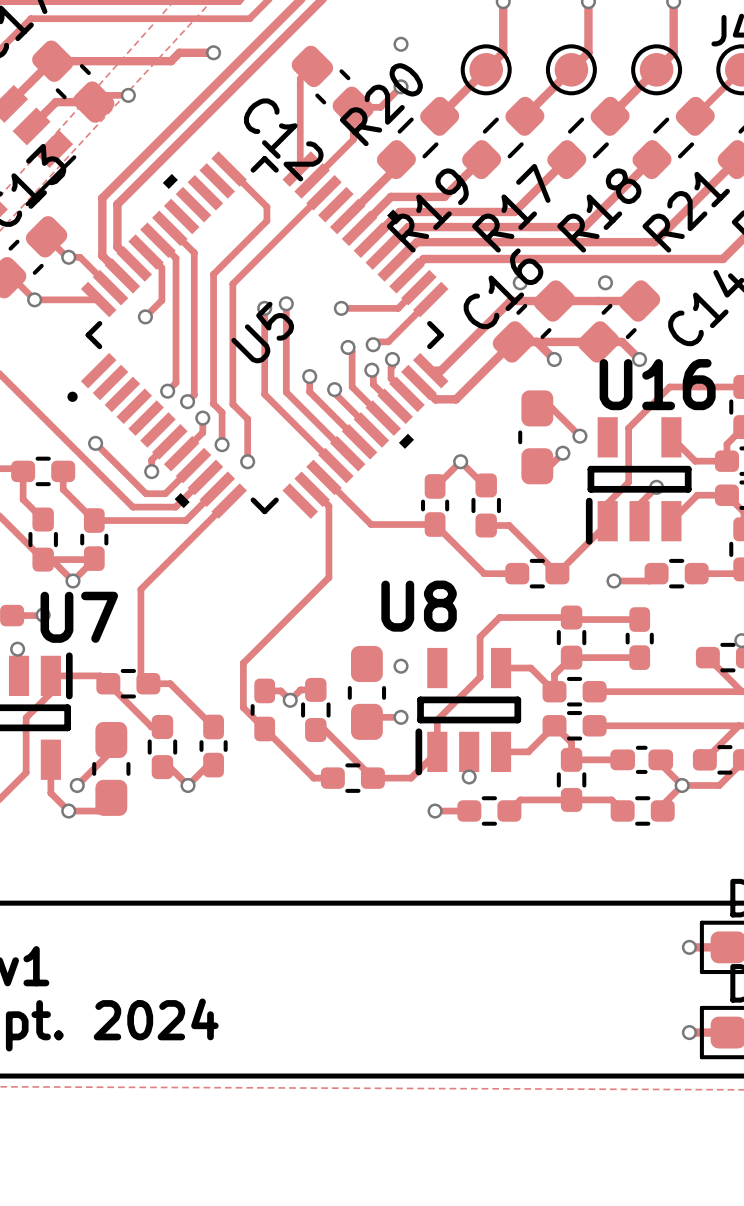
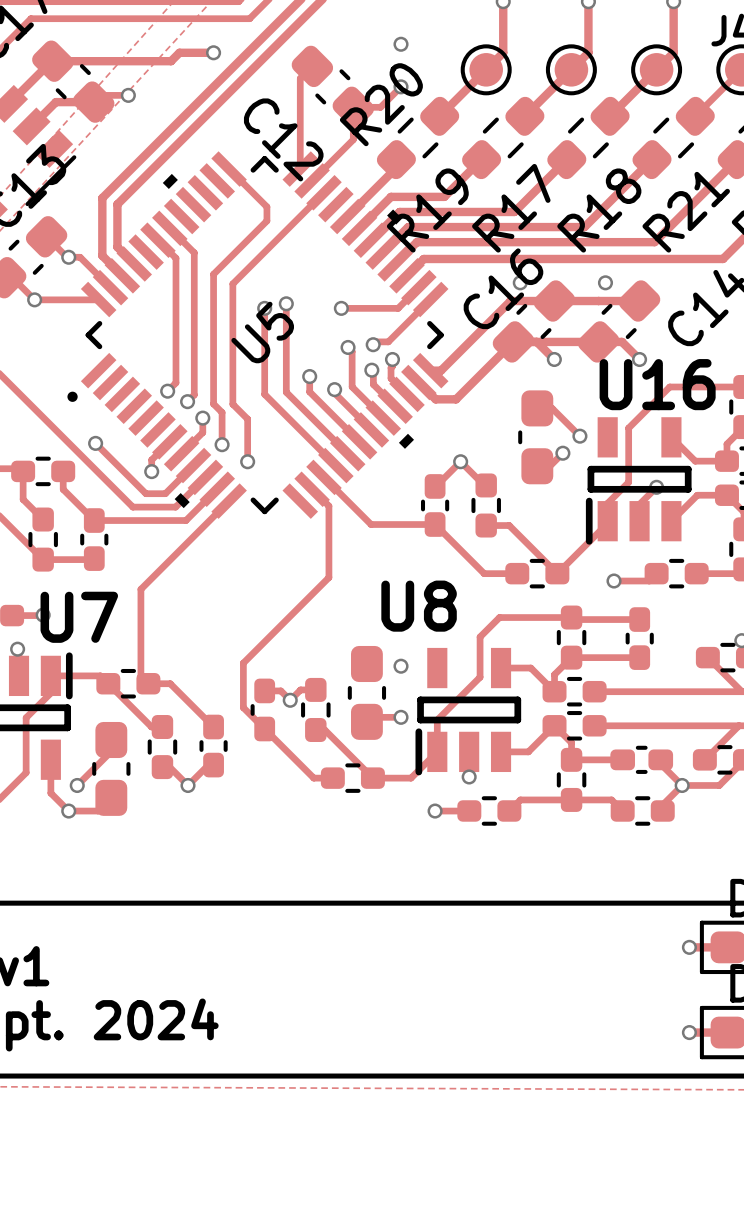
track: (146, 252) (161, 267) (161, 300) (145, 316) -> none
via: (145, 316) -> none
track: (94, 558) (72, 581) (51, 559) -> none
via: (72, 581) -> none

